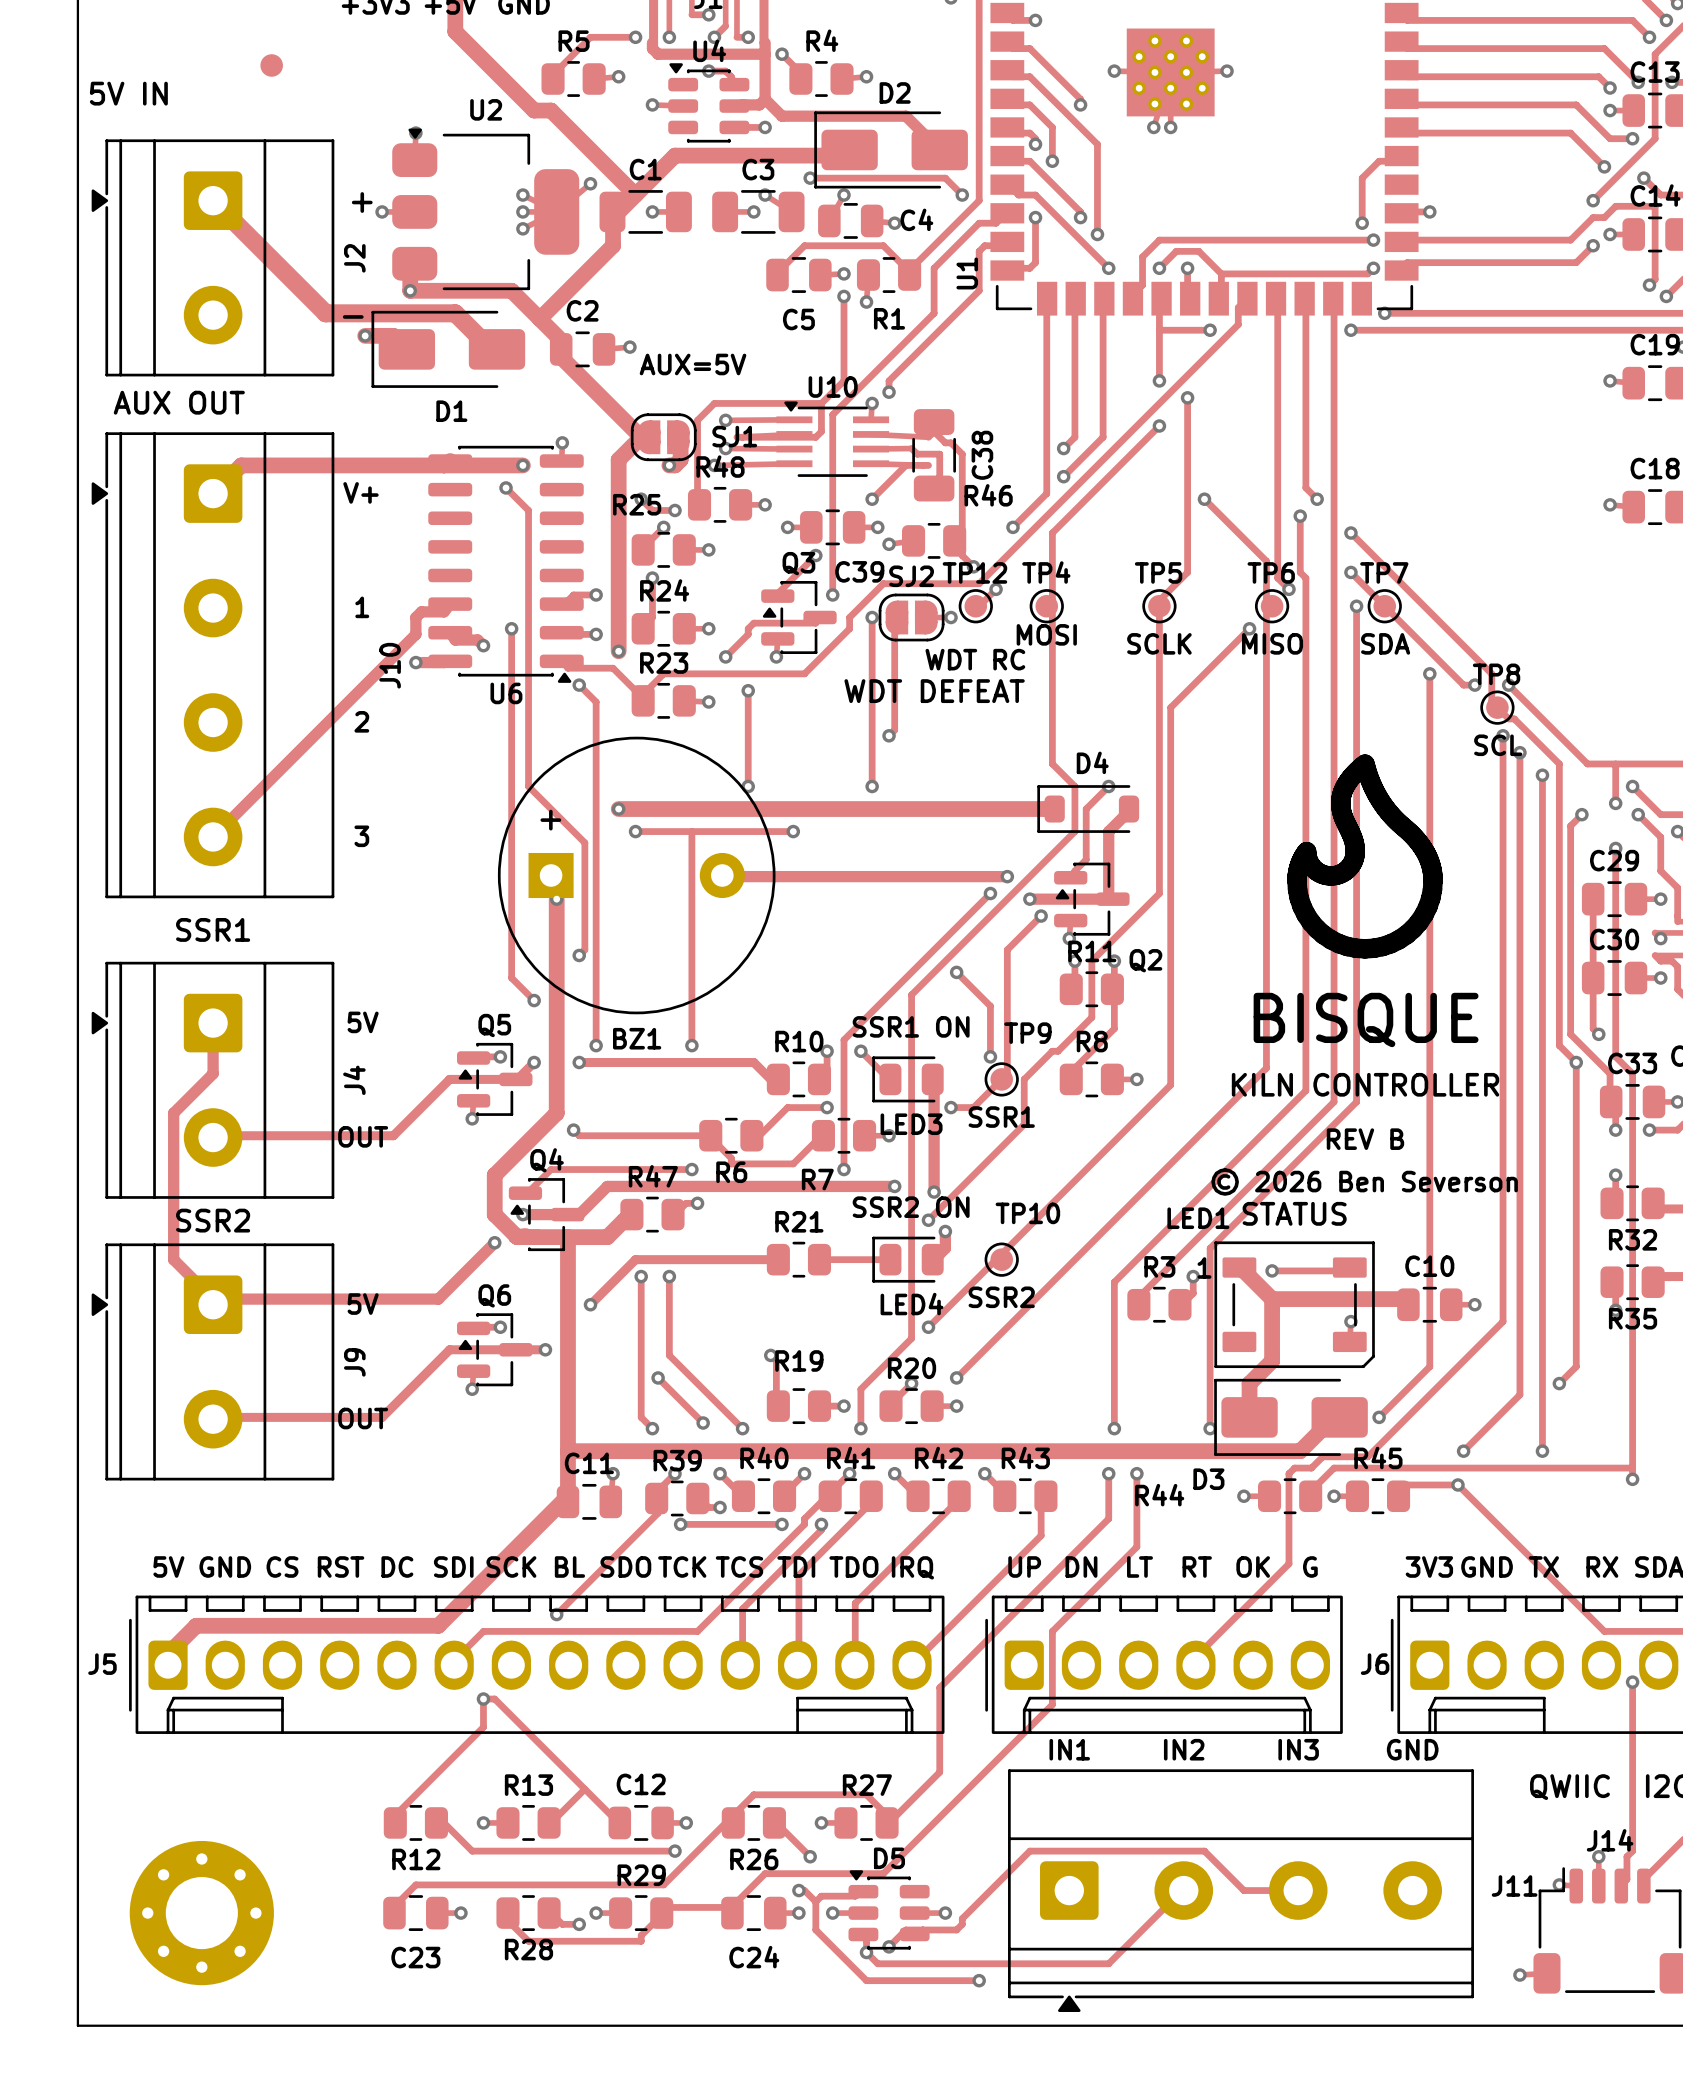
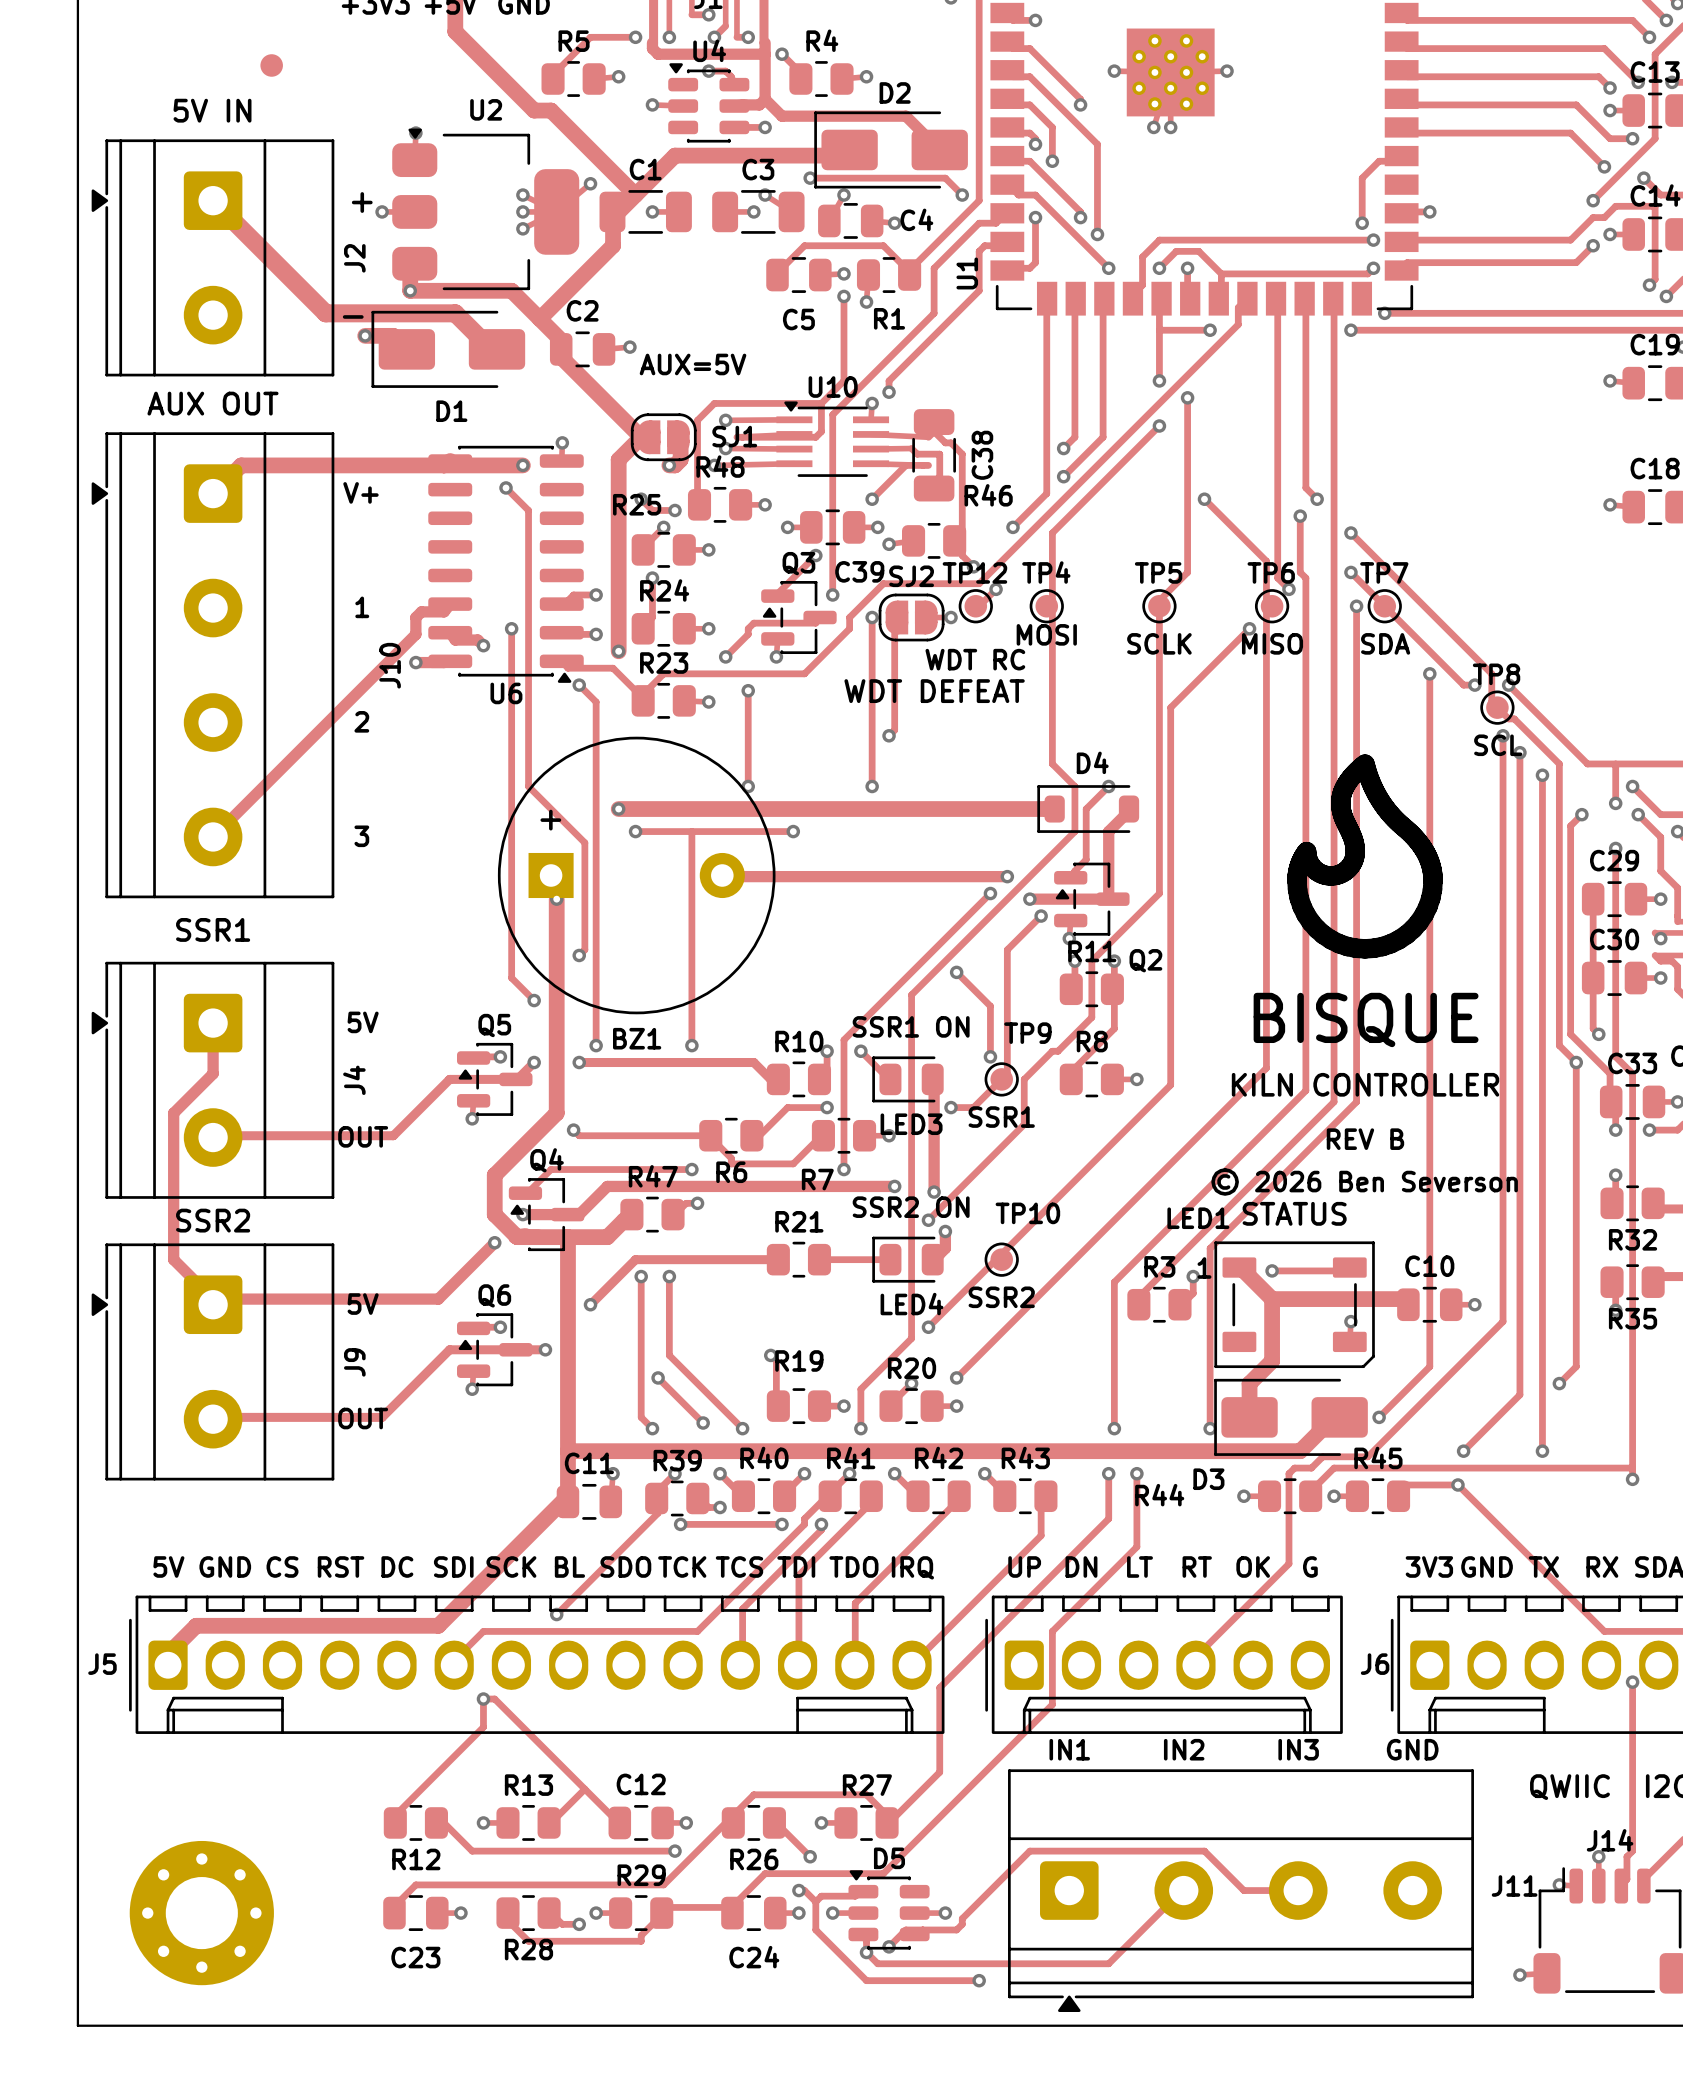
text position: 5V IN (128, 93) -> 5V IN (212, 110)
text position: AUX OUT (179, 402) -> AUX OUT (212, 403)

